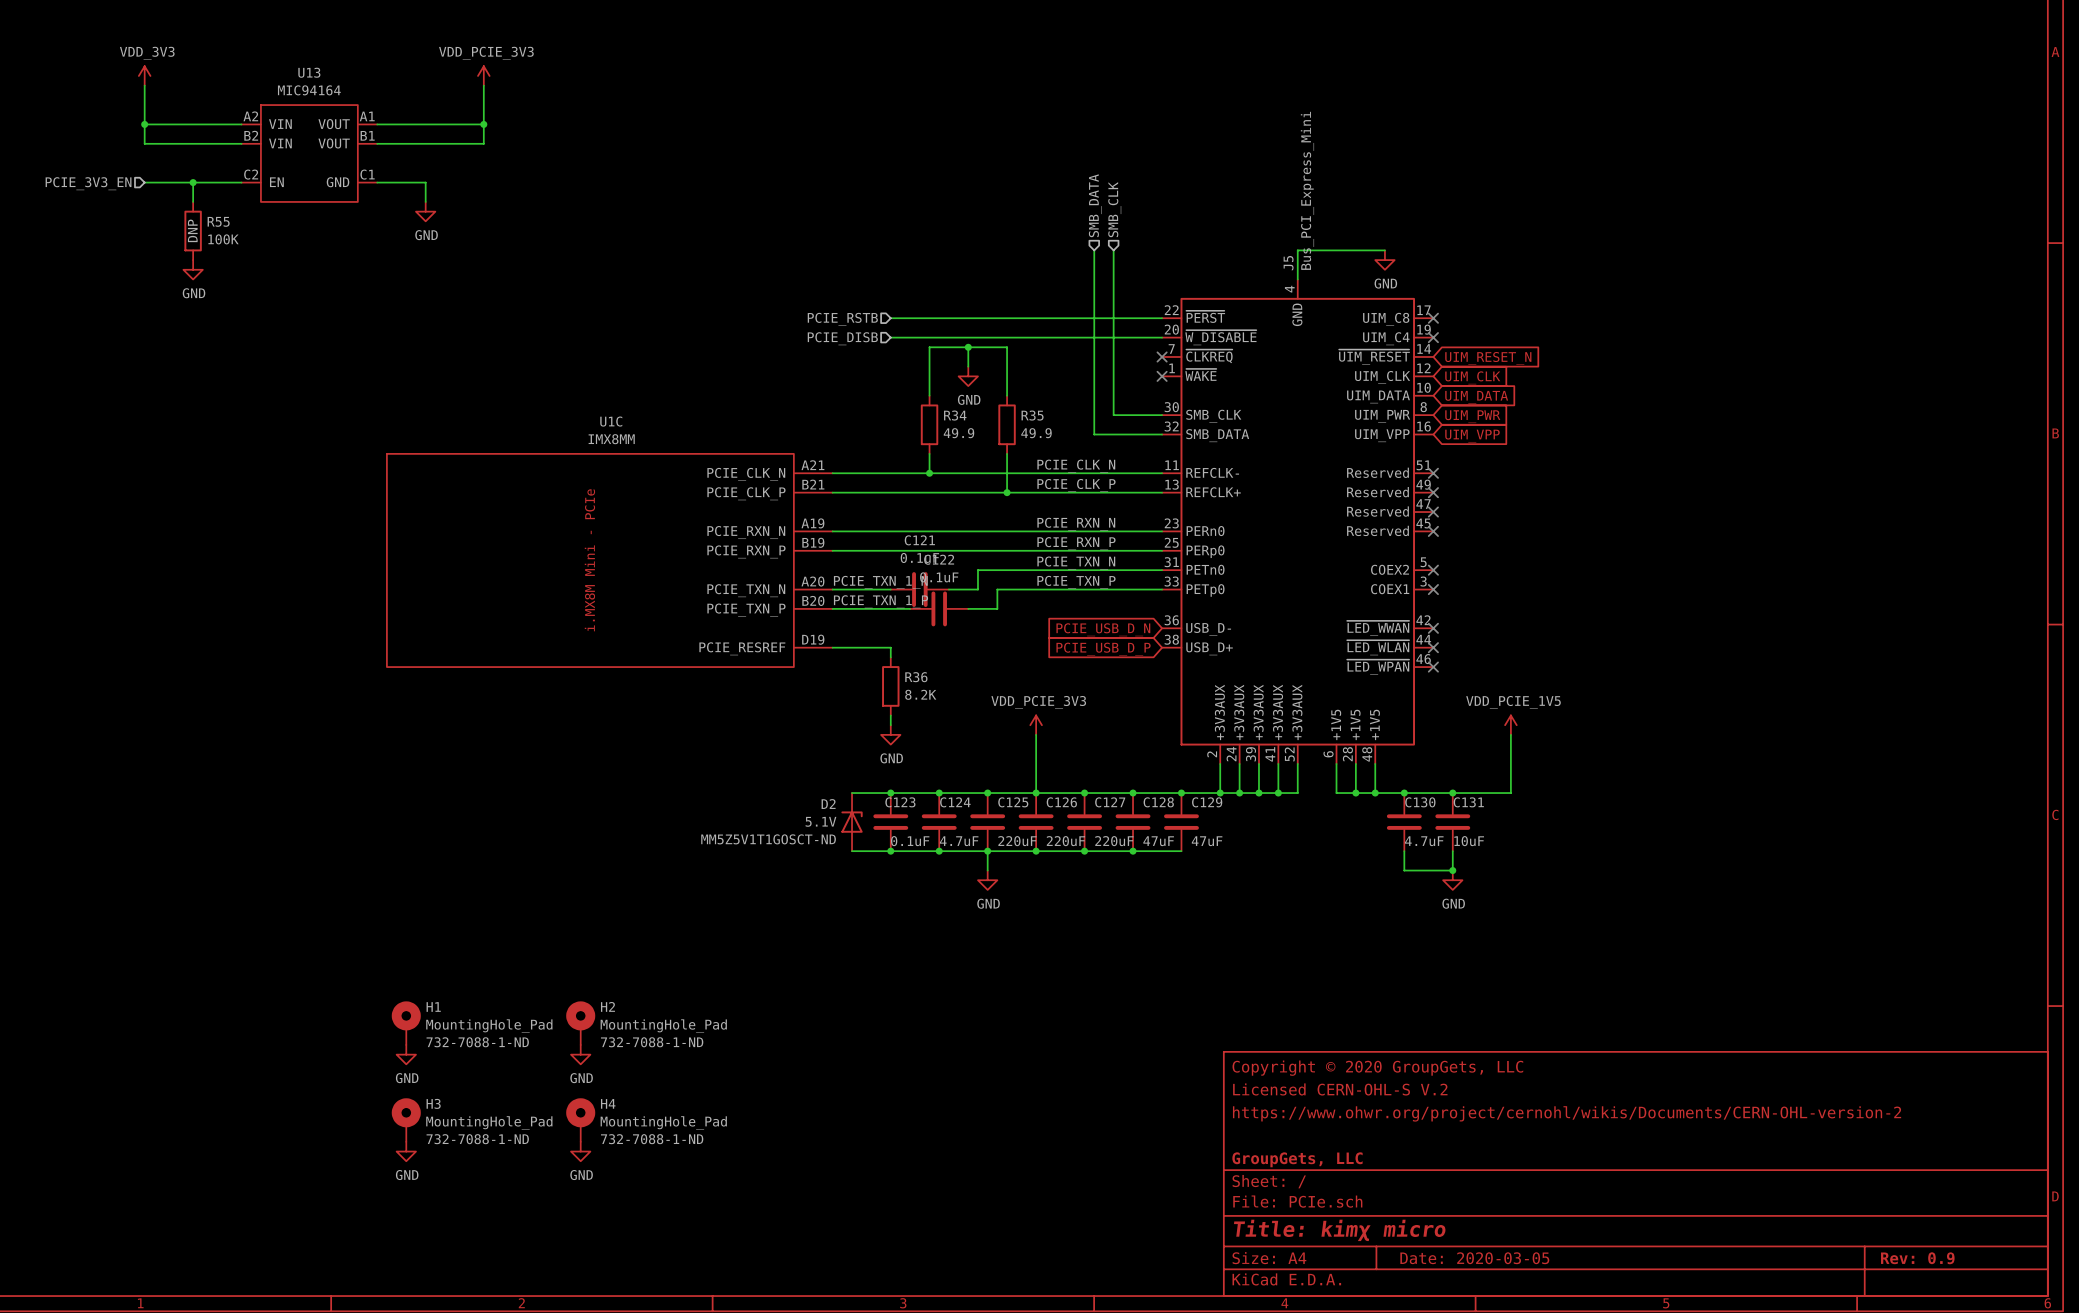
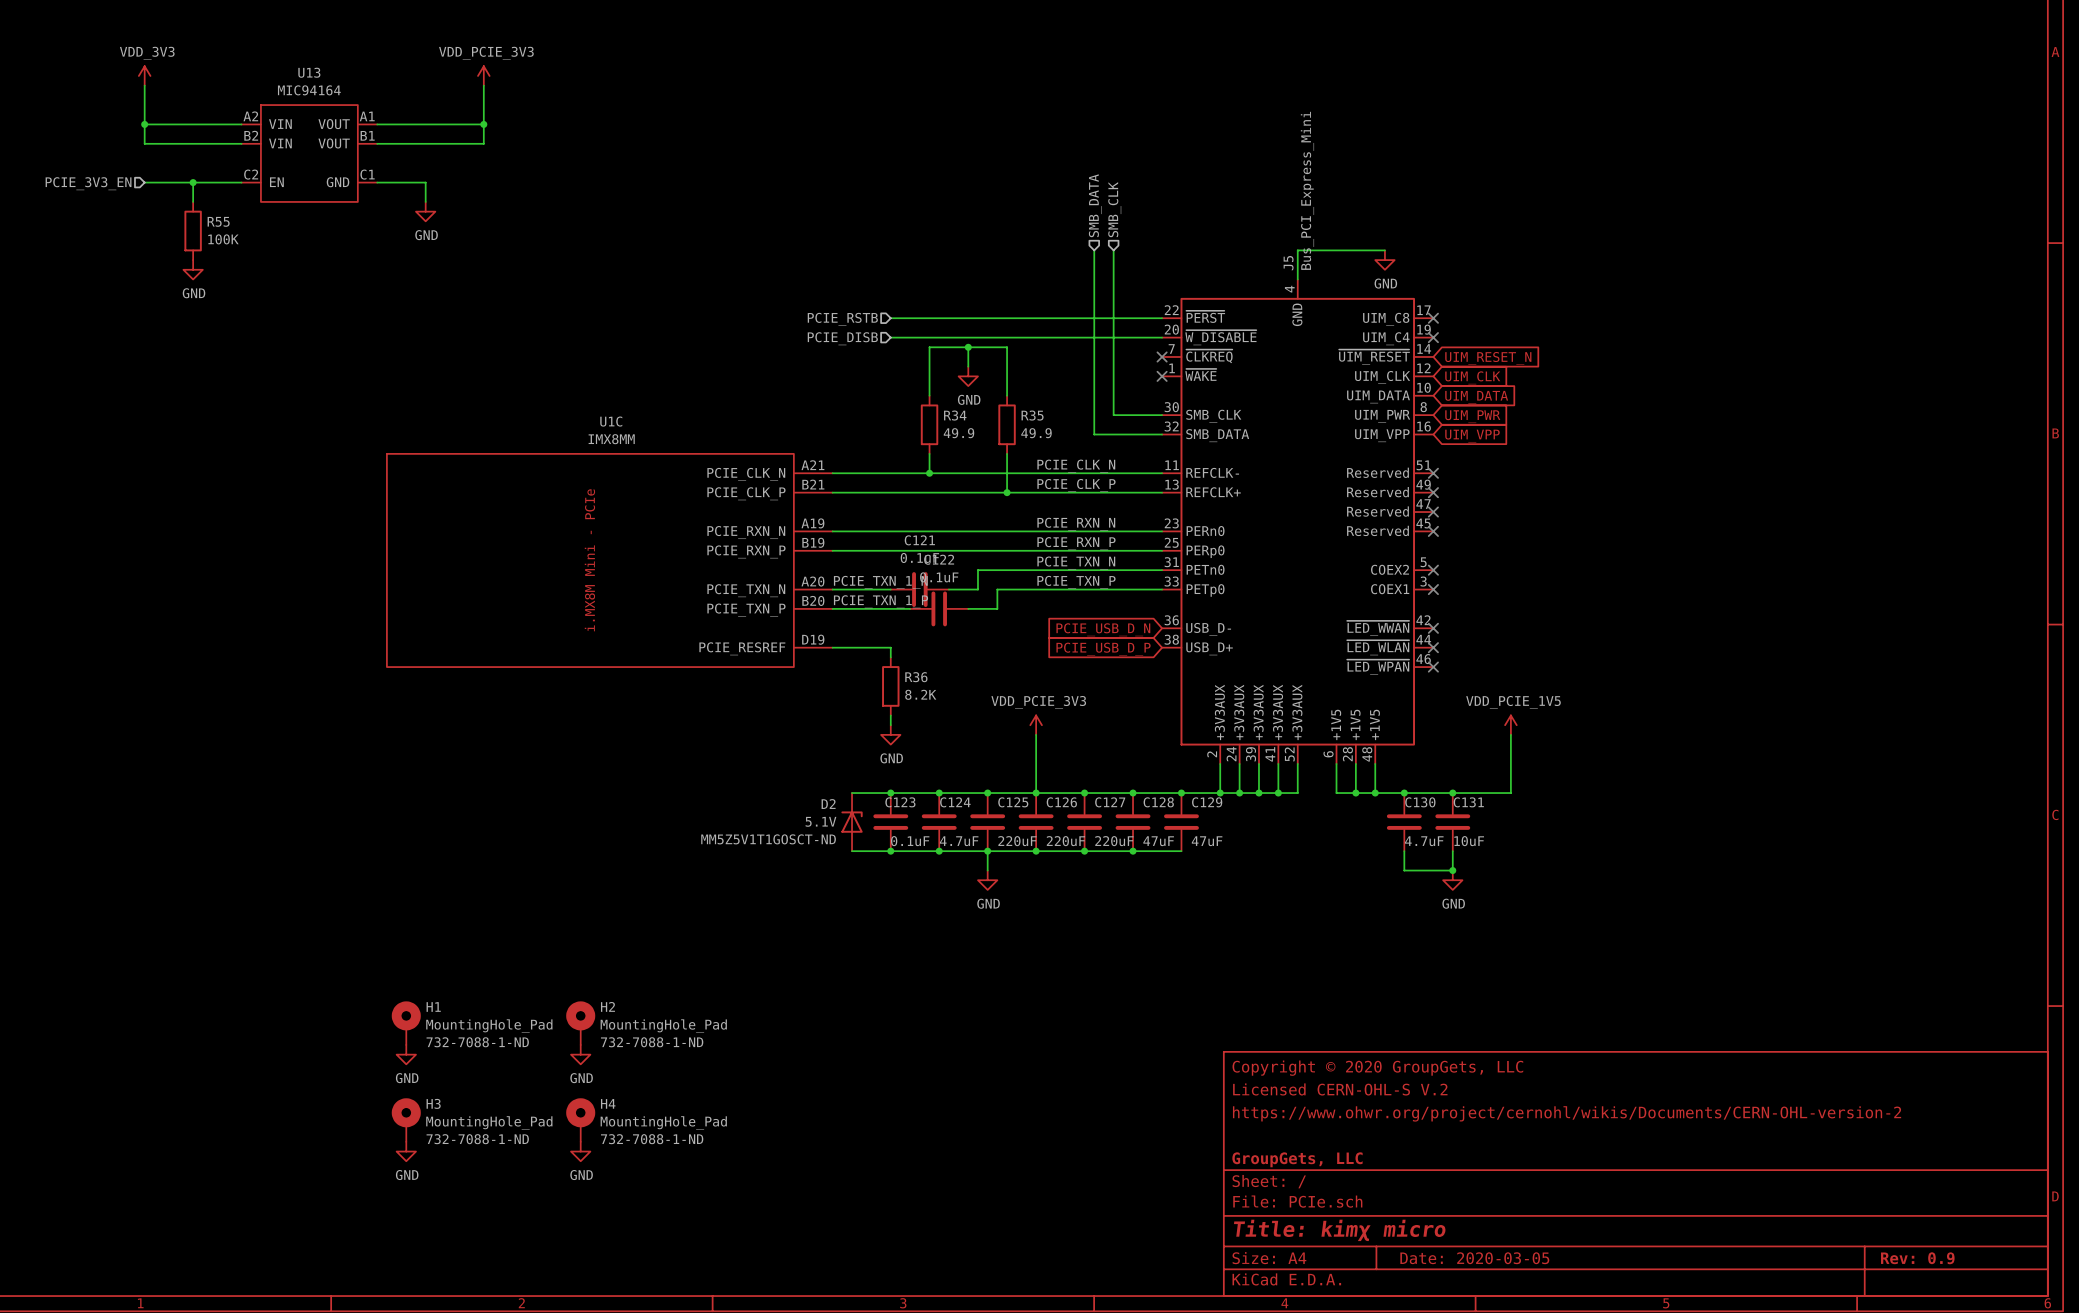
R55 text: DNP (192, 230) -> none

